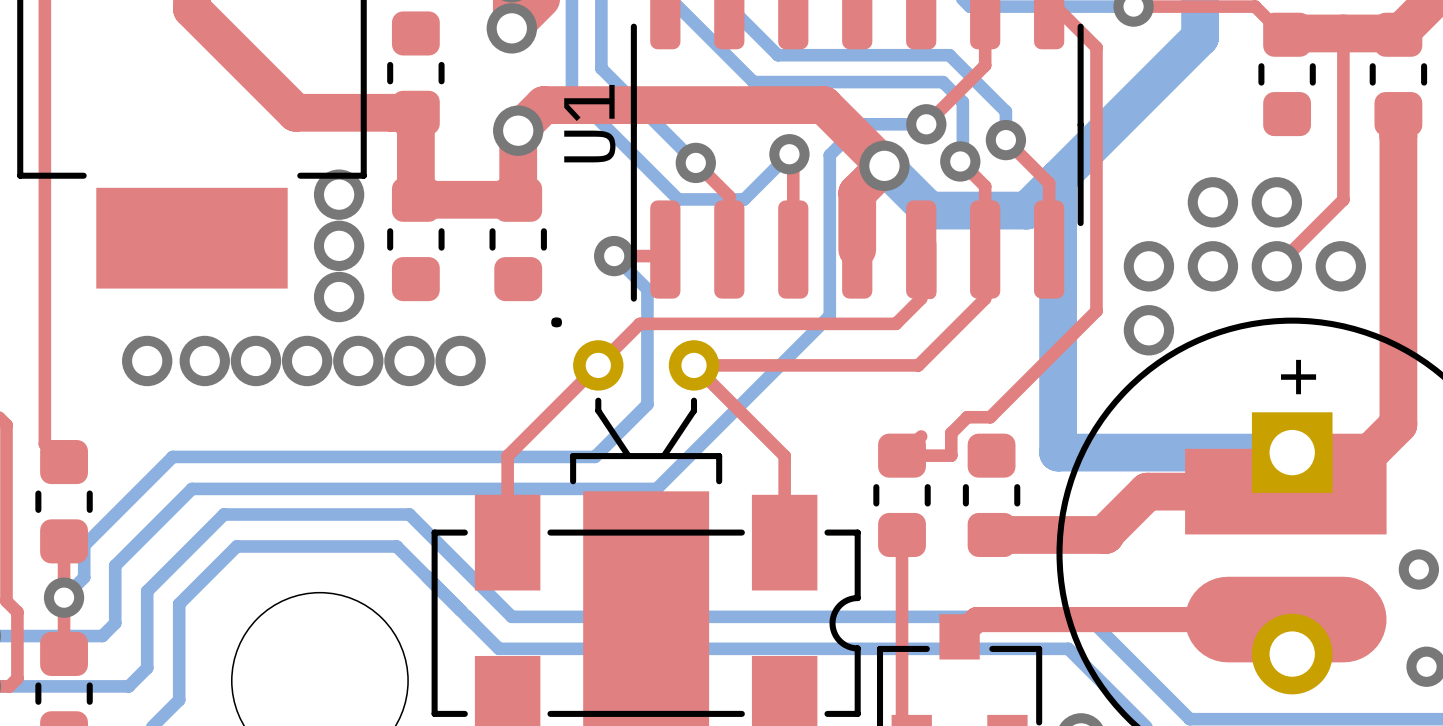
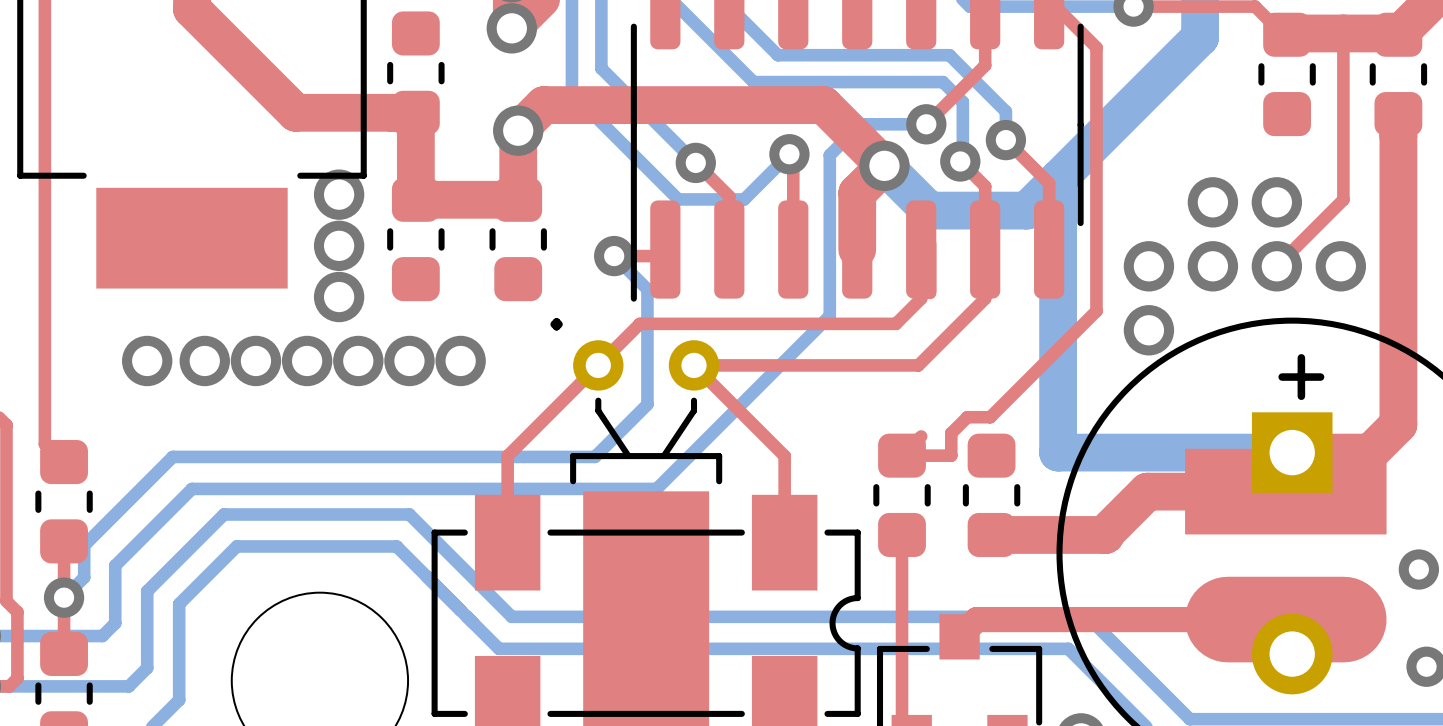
U1 name: U1 (589, 123) -> none

